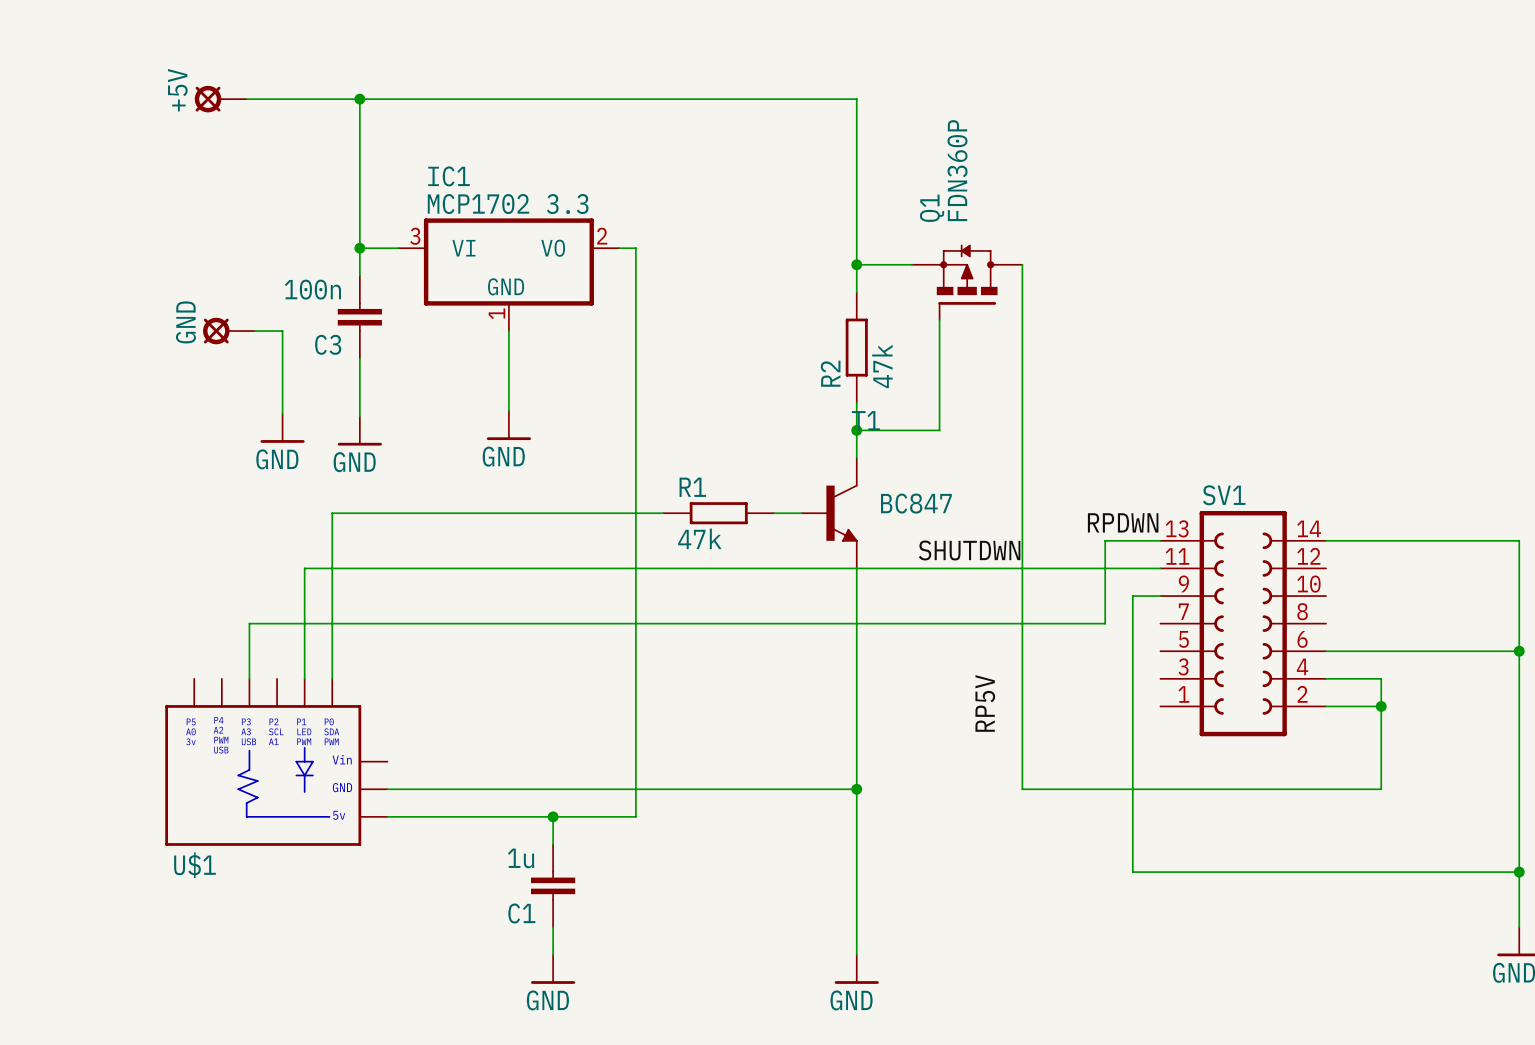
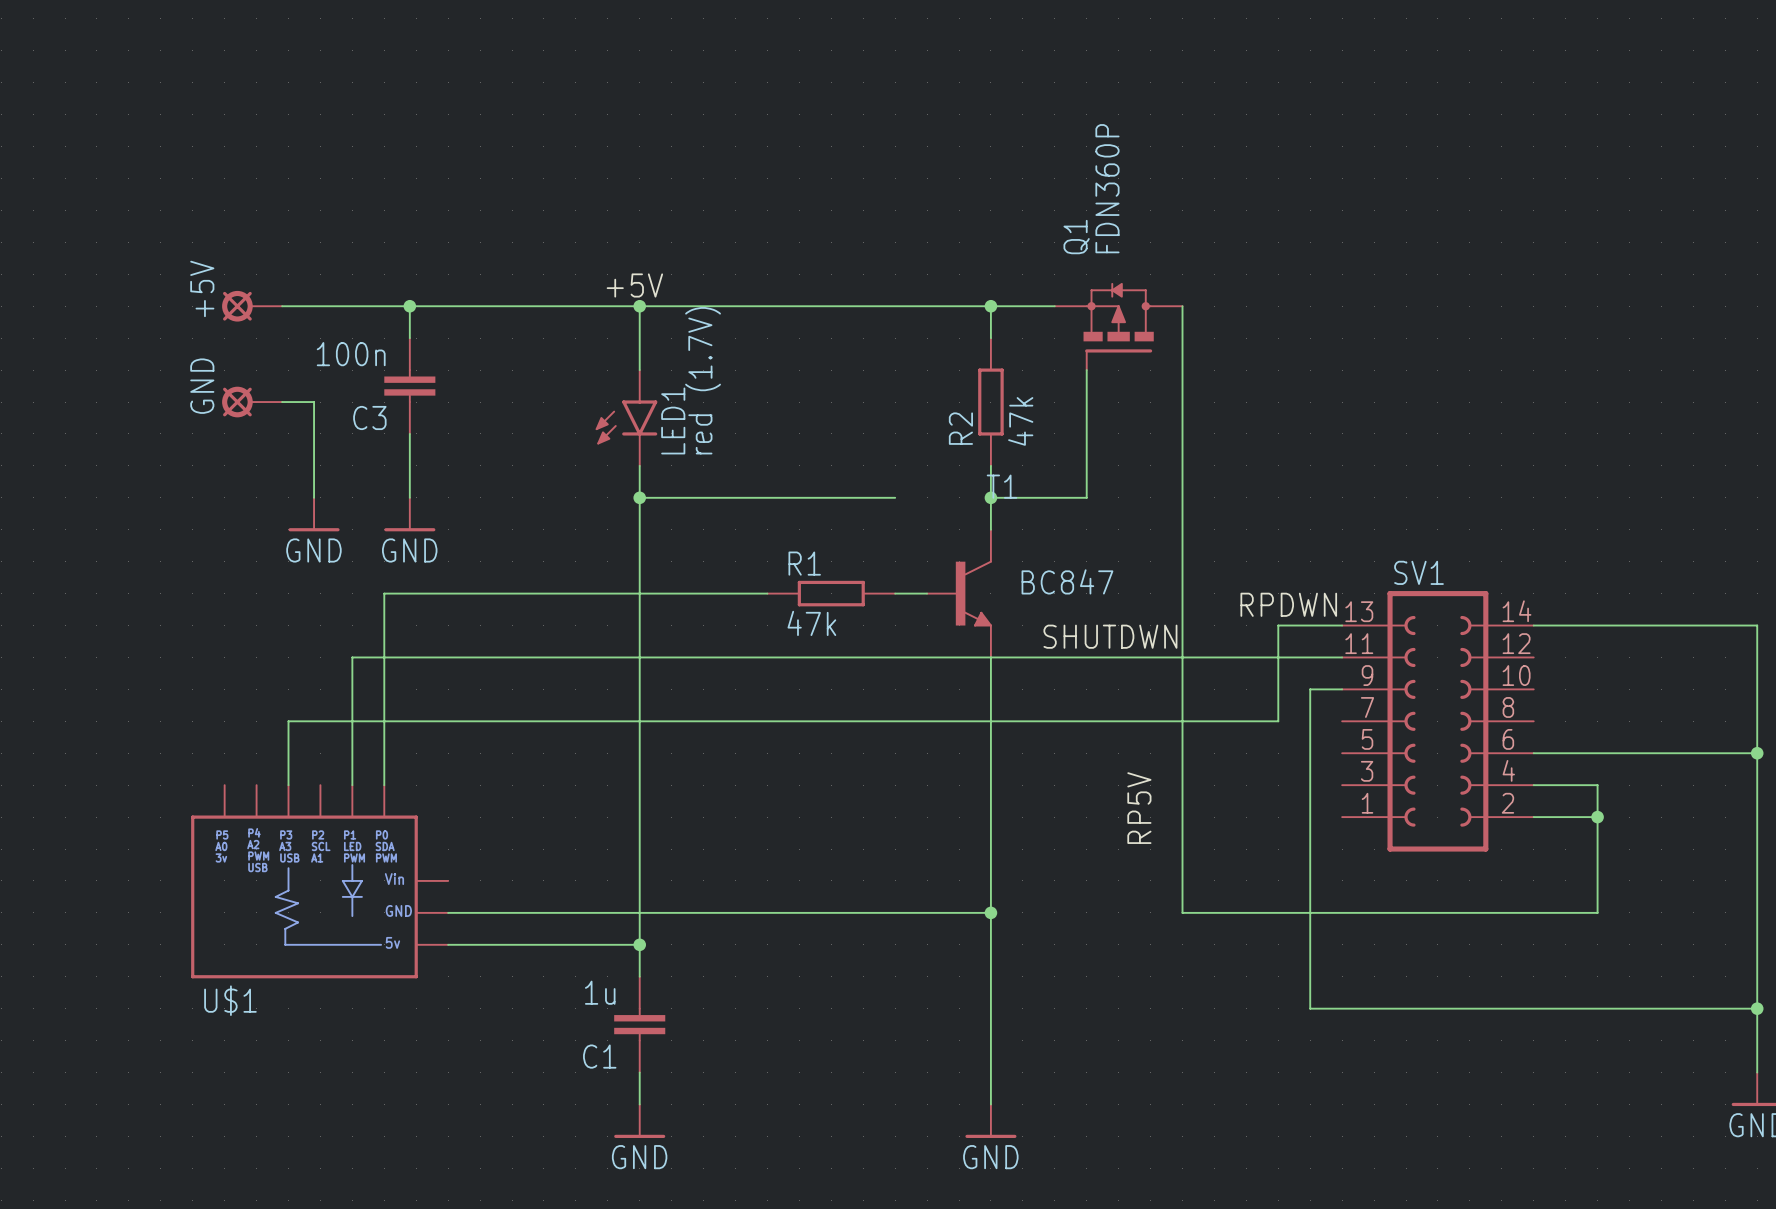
+5V position: (220, 99) -> (252, 306)
wire: (246, 99) (856, 99) (856, 264) -> (282, 306) (990, 306)
wire: (359, 99) (359, 275) -> none
junction: (359, 99) -> none
label: none -> +5V (634, 285)
wire: (359, 248) (398, 248) -> none
junction position: (359, 248) -> (409, 306)
wire: (619, 248) (635, 248) (635, 816) (553, 816) -> (639, 465) (639, 944)
wire: none -> (409, 306) (409, 338)
wire: none -> (639, 306) (639, 370)
junction: none -> (639, 306)
IC1: MCP1702 3.3 (508, 274) -> none
C3 position: (359, 317) -> (409, 386)
GND position: (229, 331) -> (252, 402)
wire: (254, 331) (282, 331) (282, 413) -> (282, 402) (314, 402) (314, 497)
wire: (508, 331) (508, 411) -> none
wire: (359, 358) (359, 416) -> none
LED1: none -> red (1.7V) (626, 417)
wire: none -> (409, 433) (409, 497)
power symbol: GND (508, 425) -> none
power symbol position: GND (282, 428) -> GND (314, 514)
wire: none -> (639, 497) (895, 497)
junction: none -> (639, 497)
power symbol position: GND (359, 431) -> GND (409, 514)

